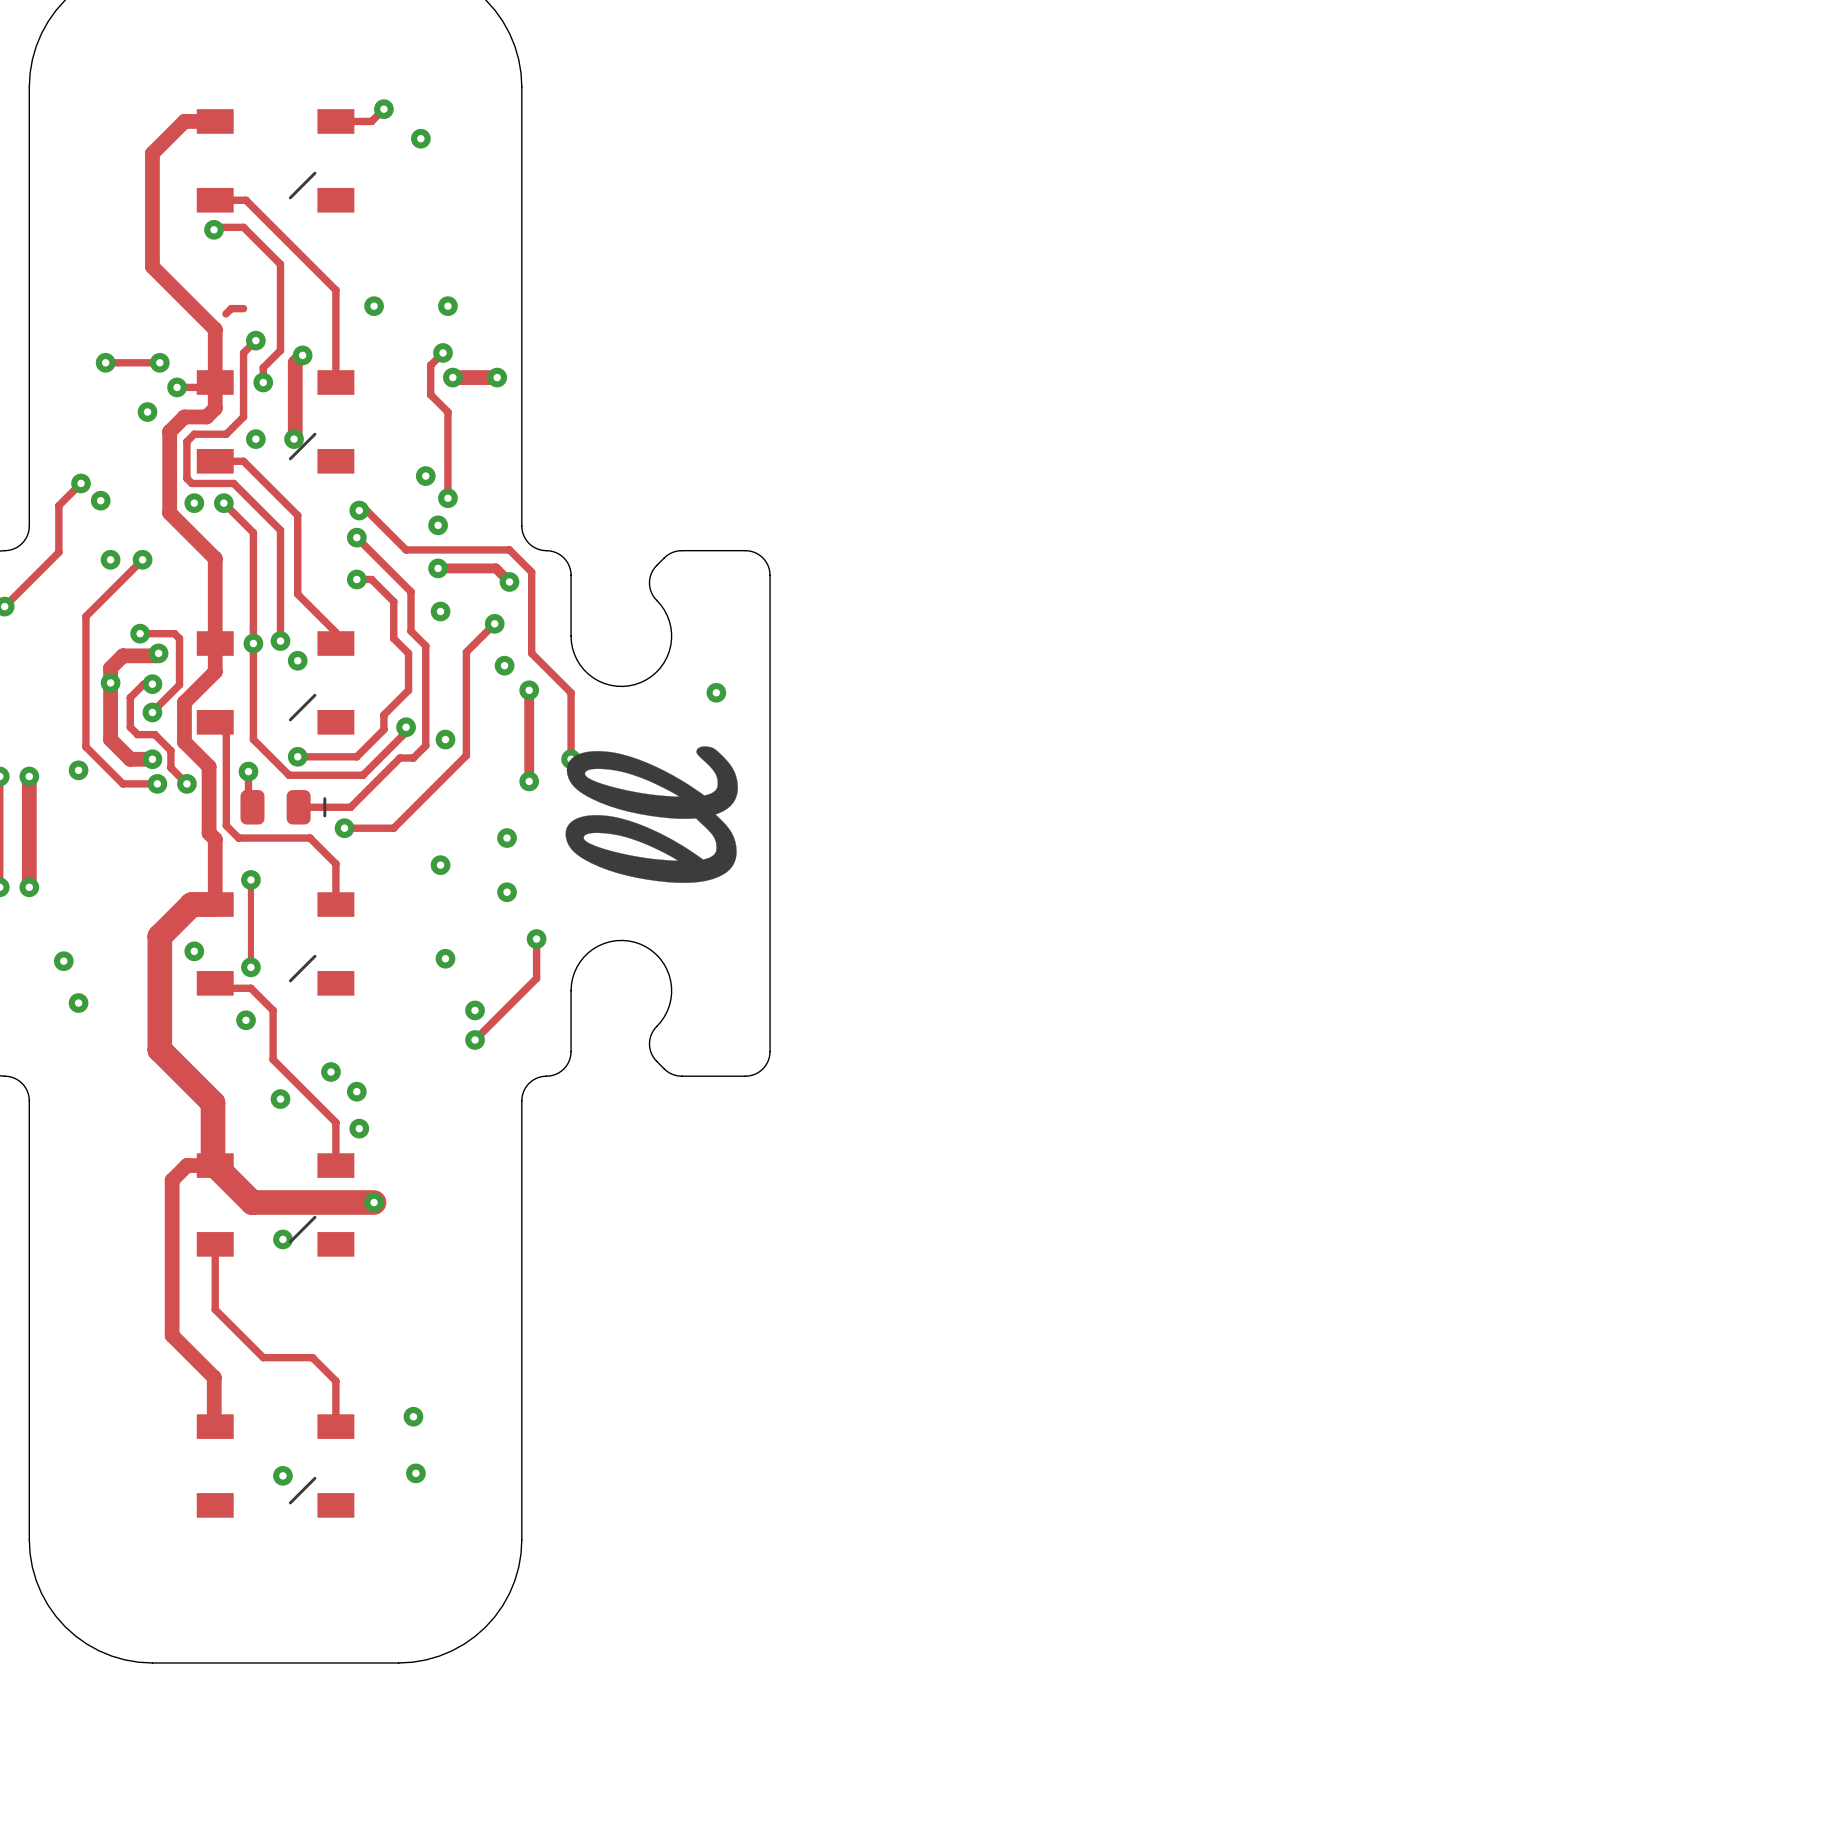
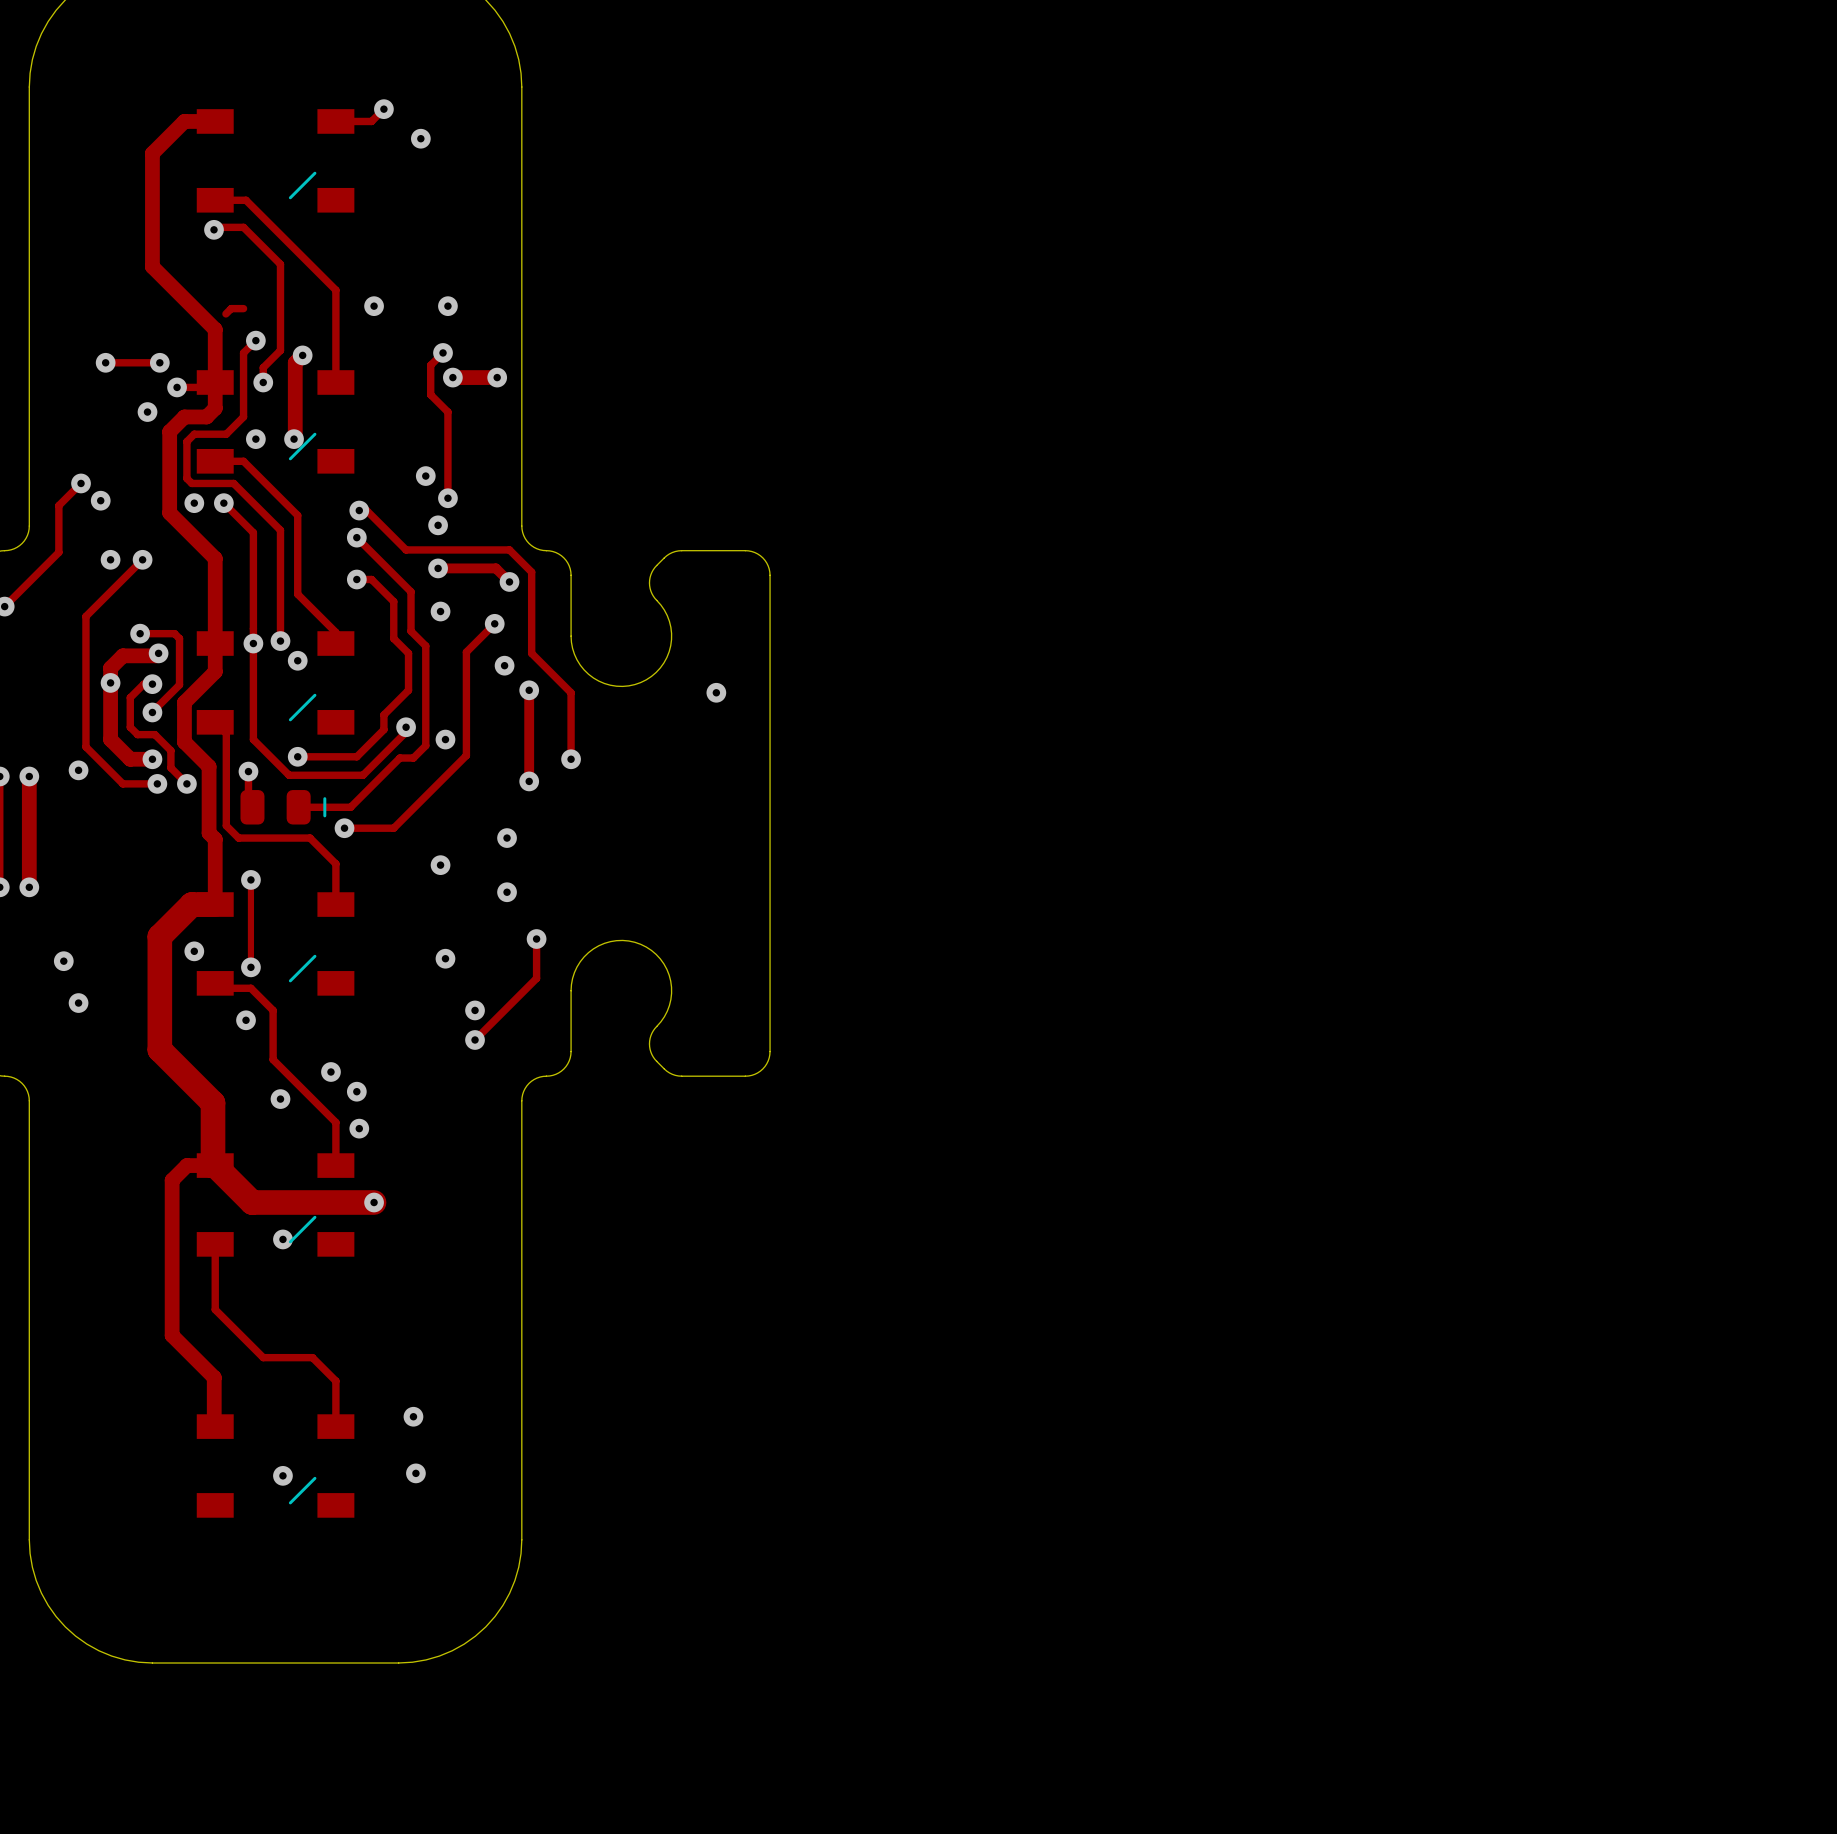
drawing: [565, 746, 738, 883] -> none

